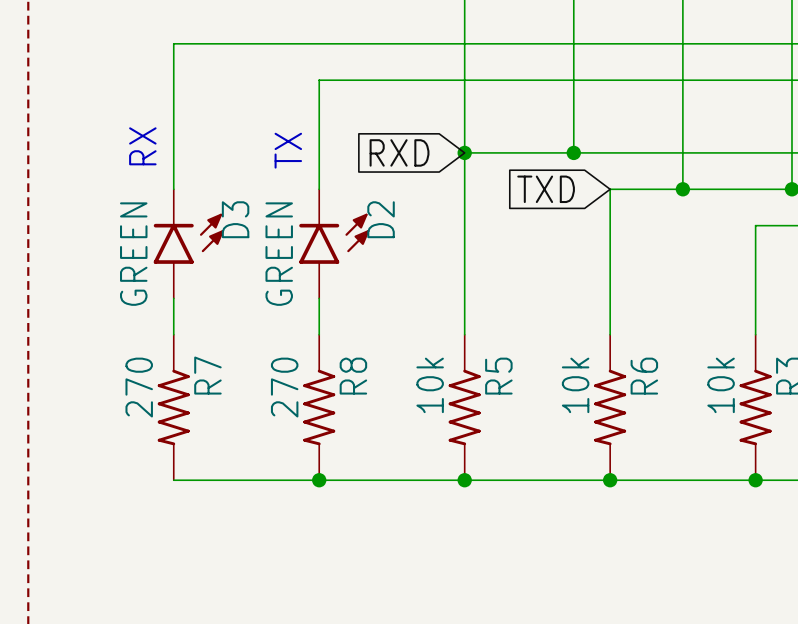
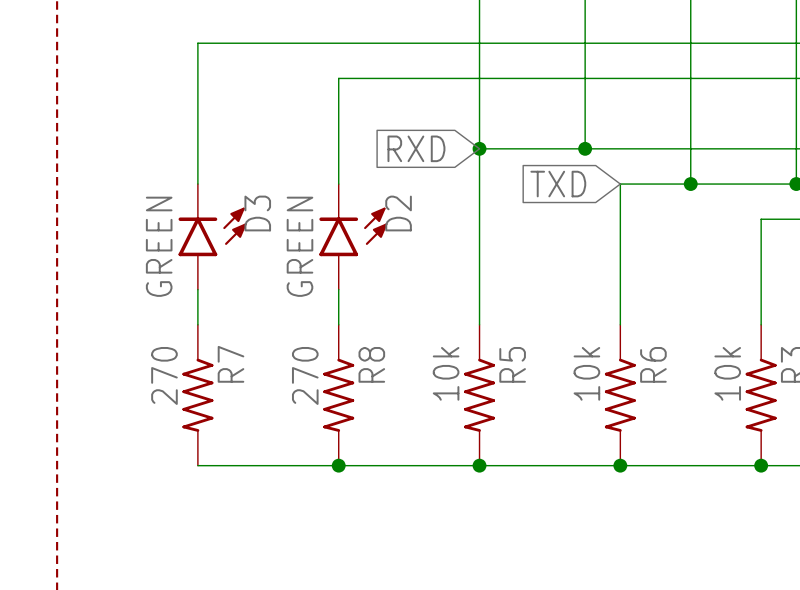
text: RX (142, 146) -> none
text: TX (288, 150) -> none

